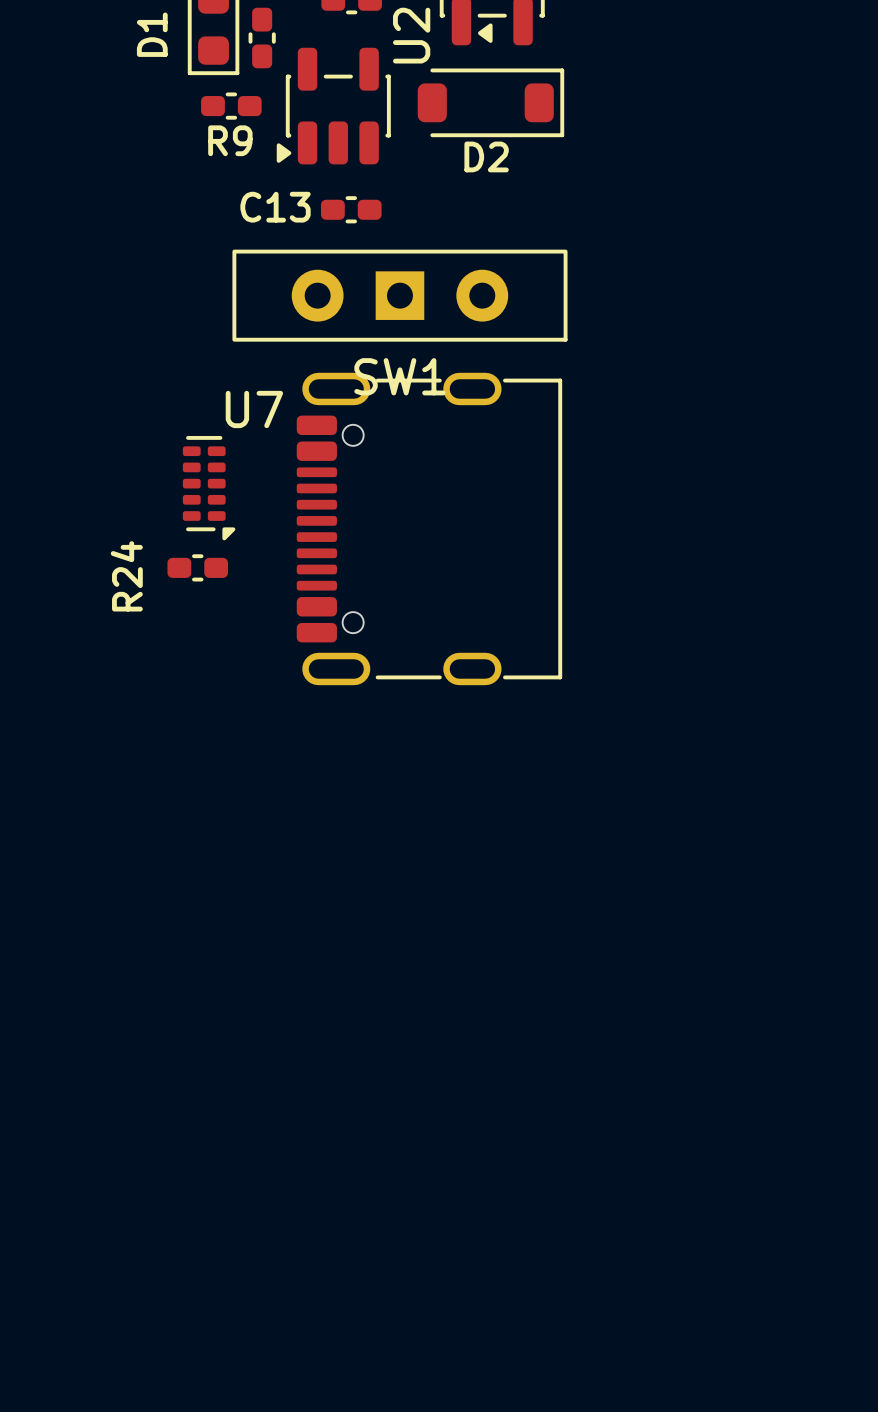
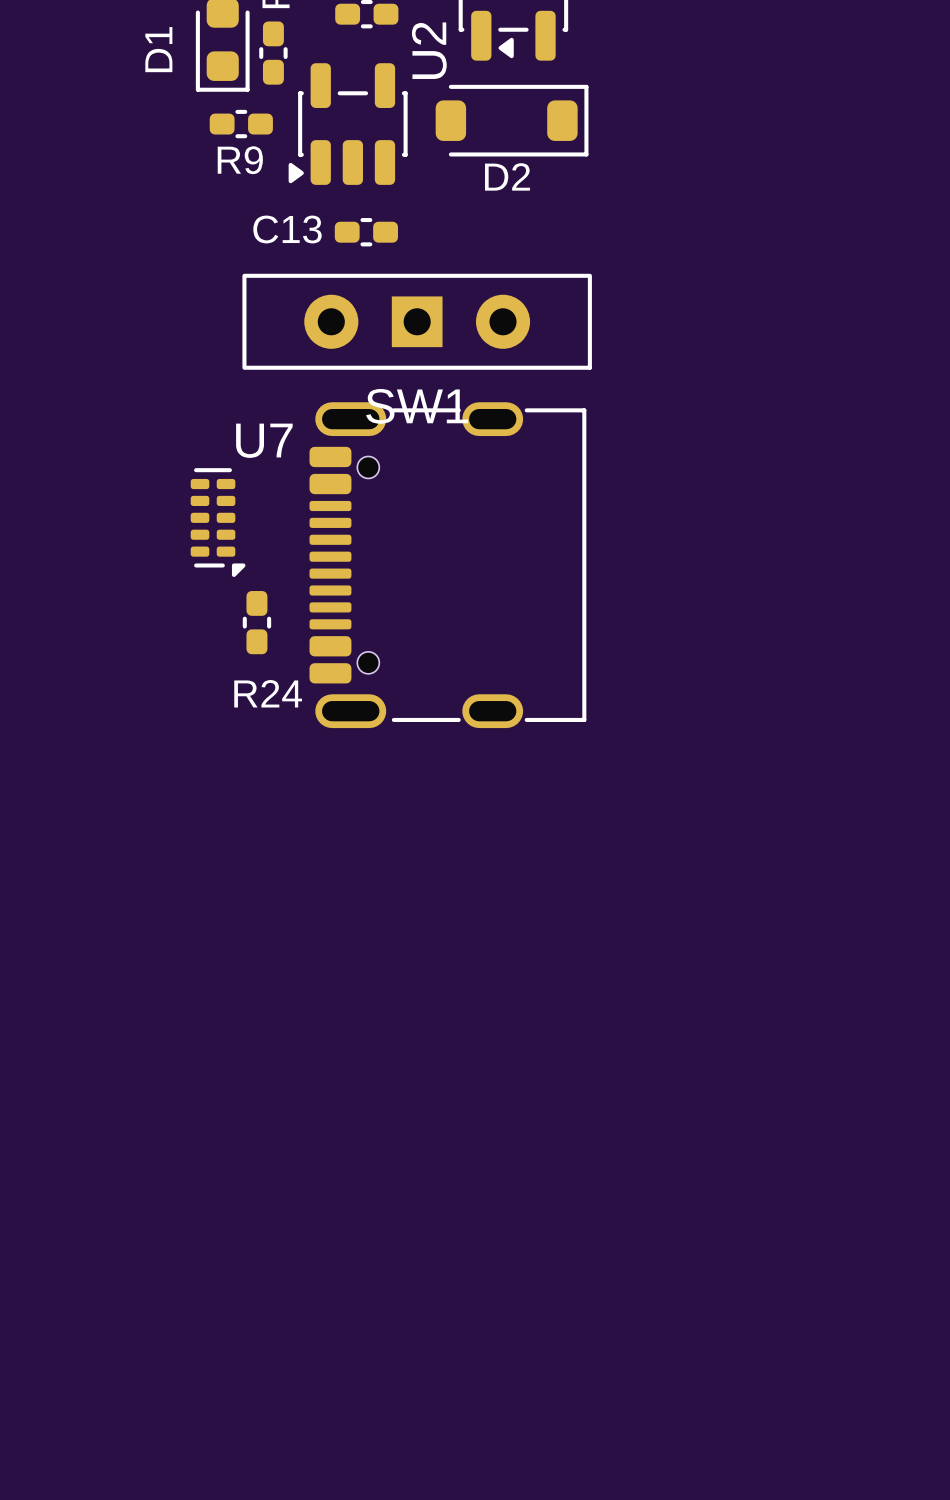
R24 rotation: 0° (197, 567) -> 90° clockwise (256, 622)
R24 position: (197, 567) -> (256, 622)
R24 name position: R24 (126, 576) -> R24 (268, 693)

